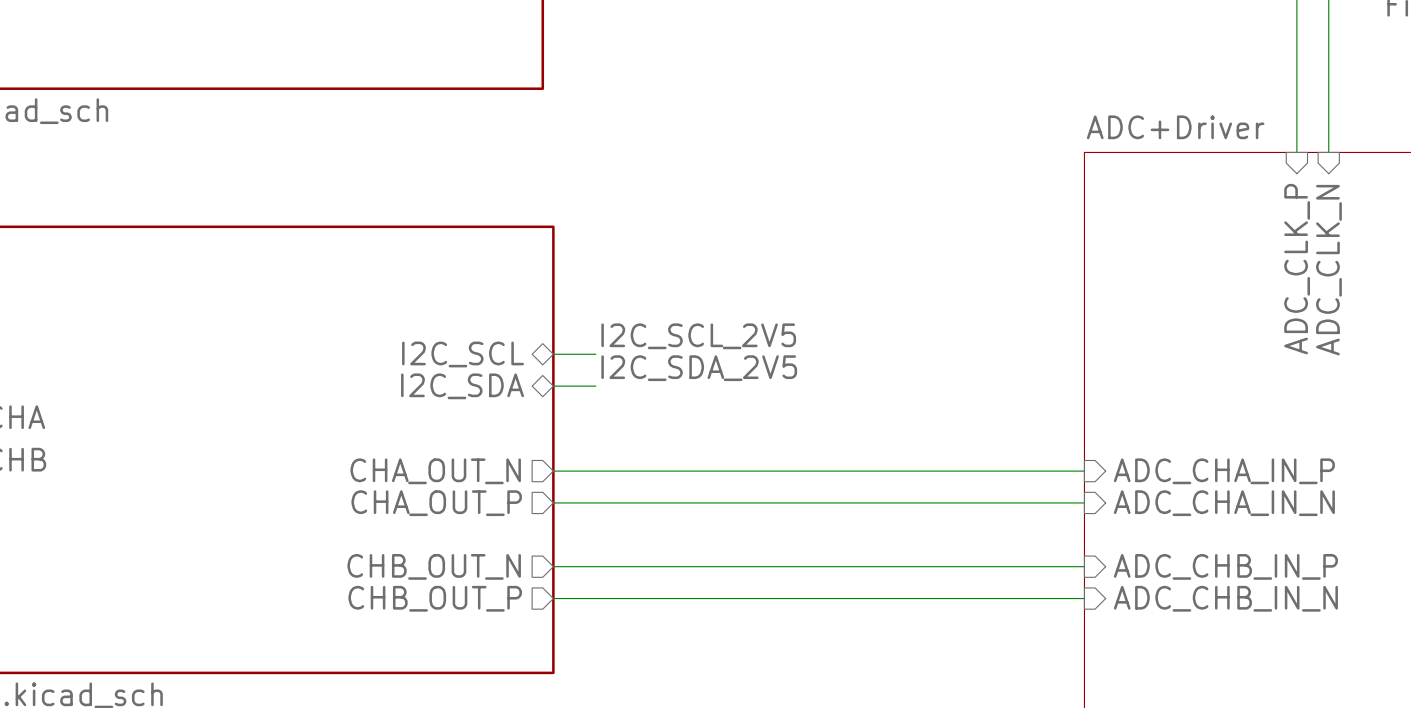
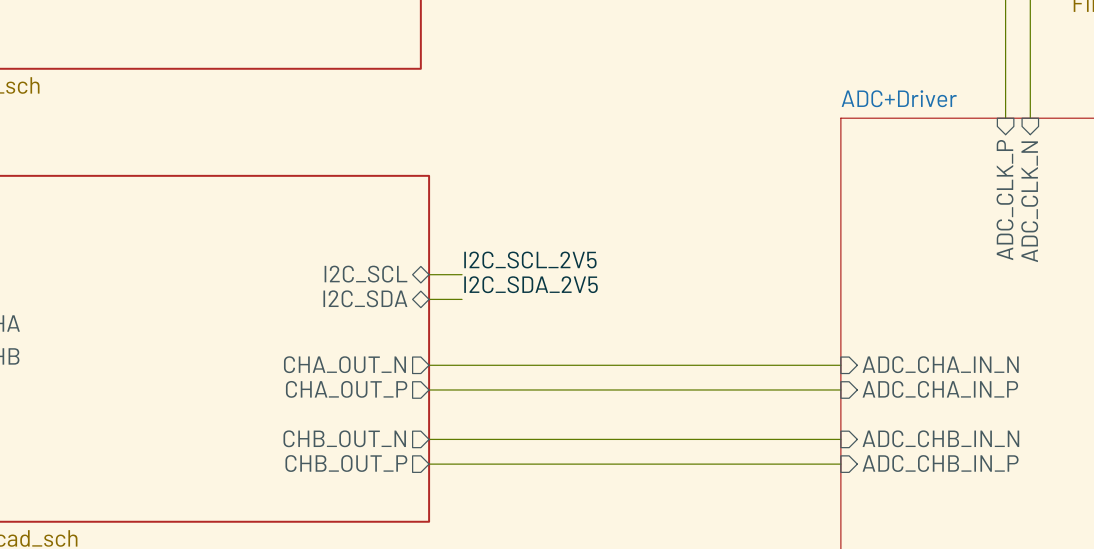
sheet pin: ADC_CHA_IN_P (1224, 471) -> ADC_CHA_IN_N (940, 364)
sheet pin: ADC_CHA_IN_N (1224, 503) -> ADC_CHA_IN_P (940, 389)
sheet pin: ADC_CHB_IN_P (1225, 566) -> ADC_CHB_IN_N (940, 438)
sheet pin: ADC_CHB_IN_N (1225, 598) -> ADC_CHB_IN_P (940, 463)

